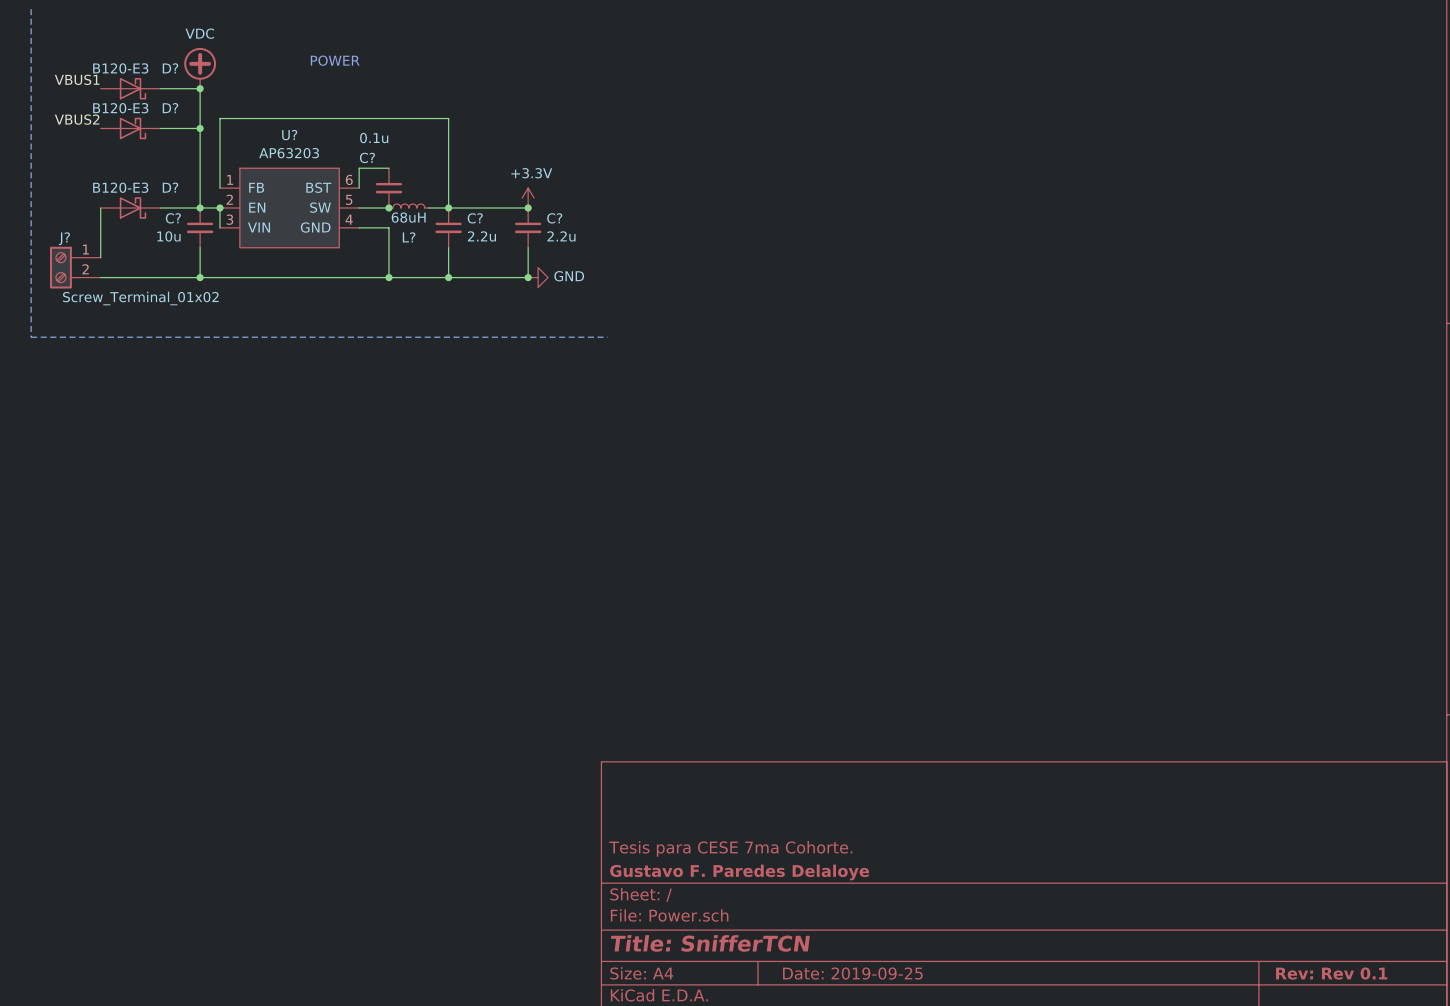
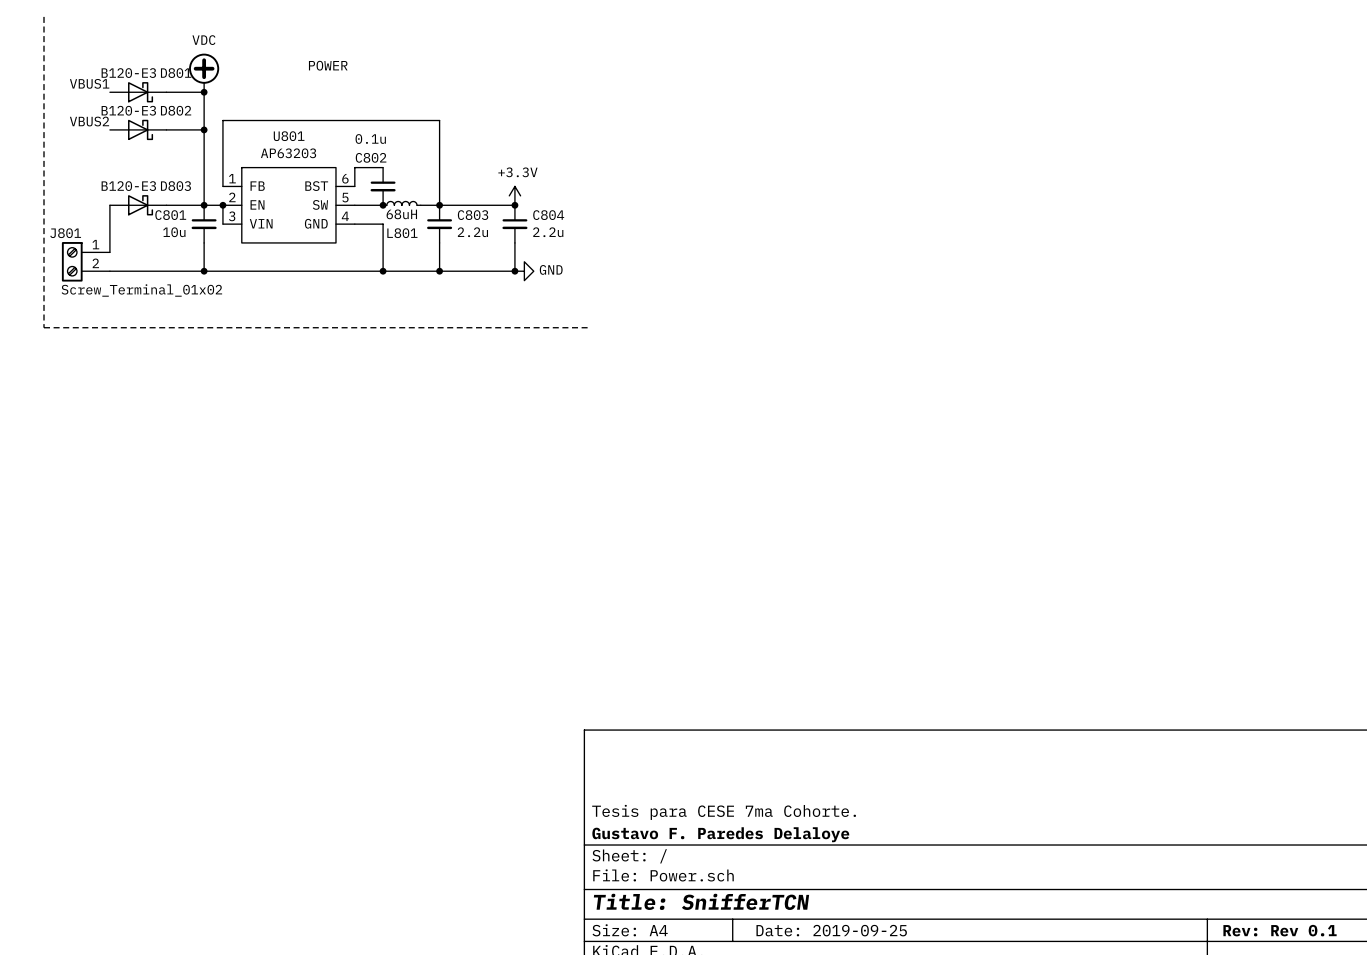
D? name: D? (170, 68) -> D801 (176, 73)
D? name: D? (170, 108) -> D802 (176, 110)
U? name: U? (289, 135) -> U801 (289, 136)
C? name: C? (367, 157) -> C802 (371, 157)
D? name: D? (170, 187) -> D803 (175, 186)
C? name: C? (173, 218) -> C801 (170, 215)
C? name: C? (475, 218) -> C803 (473, 215)
C? name: C? (554, 218) -> C804 (548, 215)
L? name: L? (409, 237) -> L801 (402, 233)
J? name: J? (64, 238) -> J801 (65, 233)

